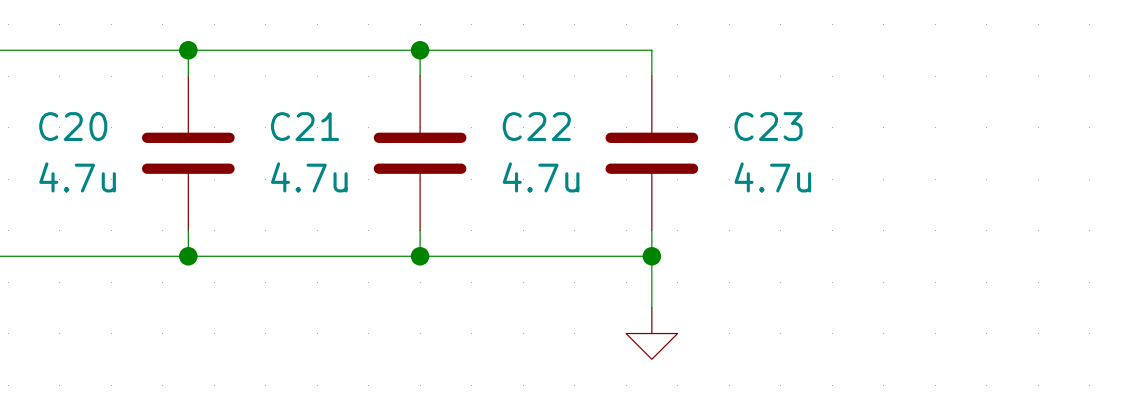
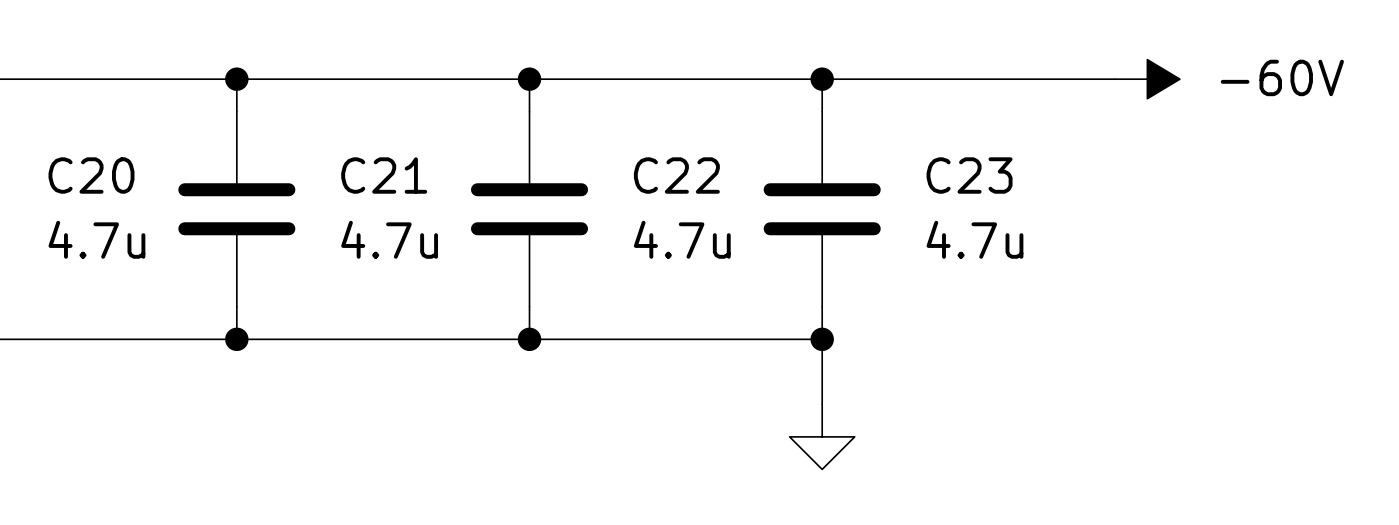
wire: none -> (822, 79) (1114, 79)
junction: none -> (822, 79)
power symbol: none -> -60V (1147, 79)

